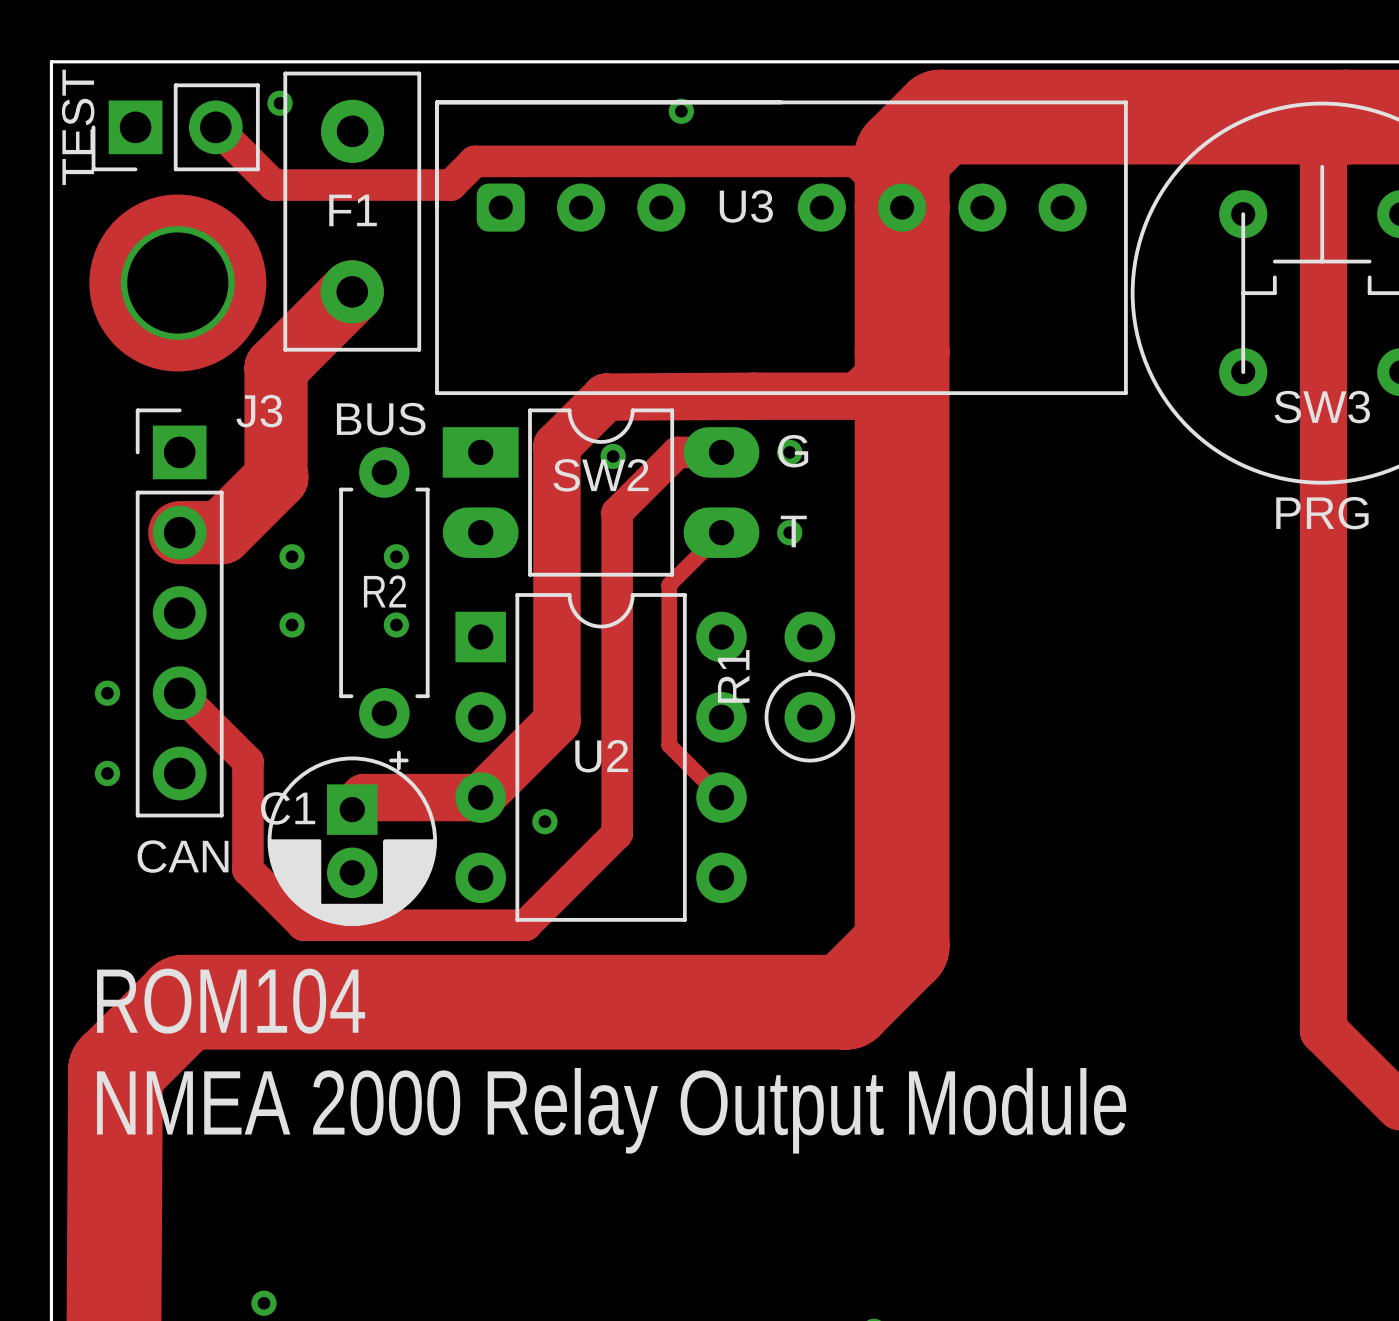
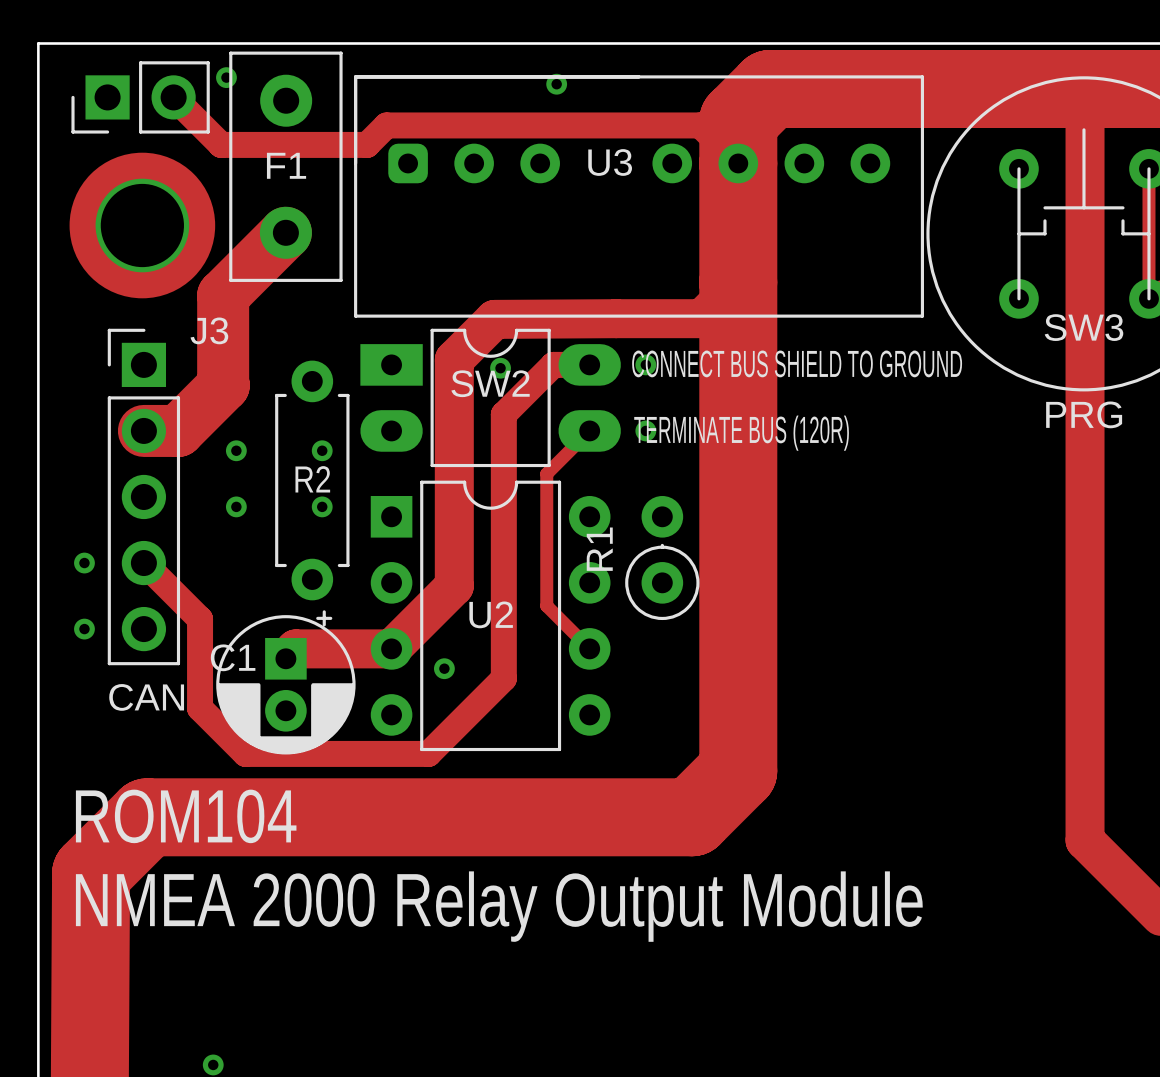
TEST name: TEST (78, 127) -> none
SW2 value: BUS (381, 419) -> none
text: G (793, 451) -> CONNECT BUS SHIELD TO GROUND (797, 363)
text: T (793, 531) -> TERMINATE BUS (120R) (741, 433)

